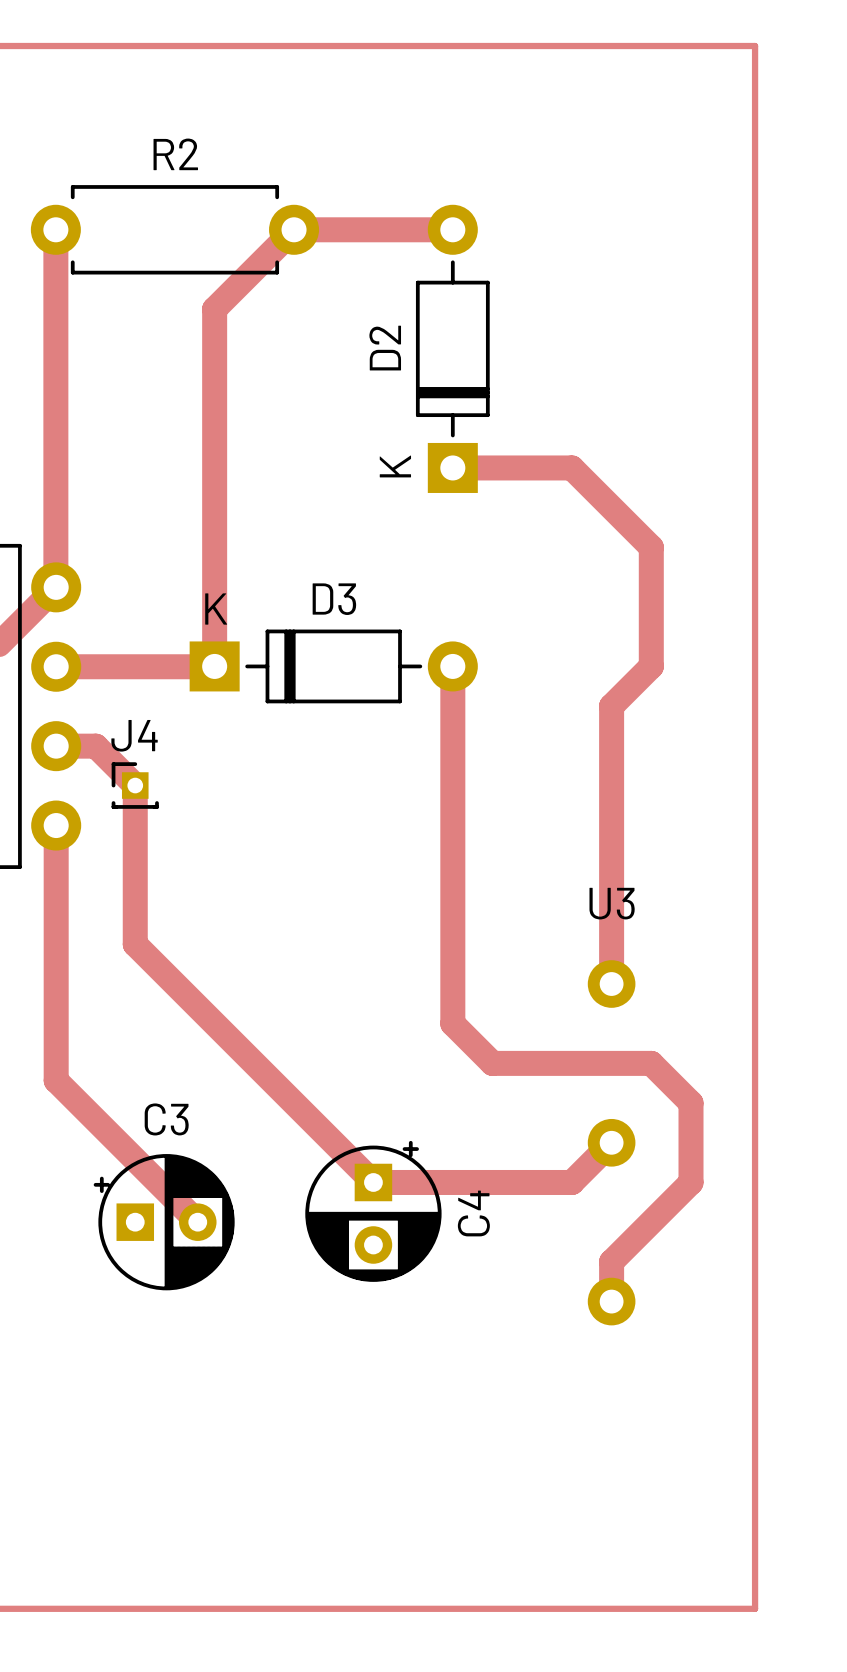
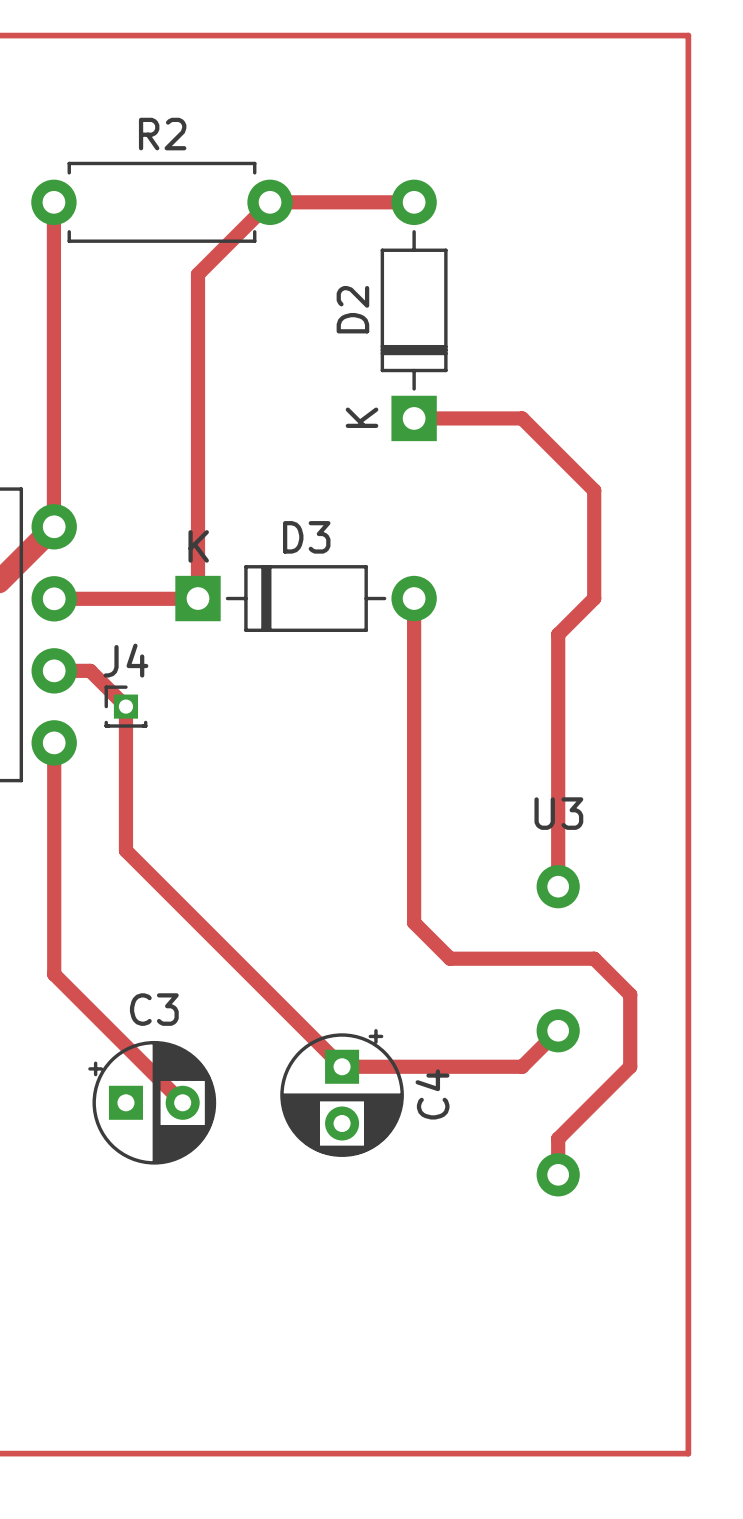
top track width: thick (55, 229) (55, 587) -> thin (53, 202) (53, 526)
top track width: thick (452, 229) (294, 229) (214, 309) (214, 666) -> thin (414, 202) (270, 202) (198, 274) (198, 598)
top track width: thick (452, 467) (571, 467) (651, 547) (651, 666) (611, 706) (611, 984) -> thin (414, 418) (522, 418) (594, 490) (594, 598) (558, 634) (558, 886)
top track width: thick (56, 666) (214, 666) -> thin (54, 598) (197, 598)
top track width: thick (452, 666) (452, 1023) (492, 1063) (651, 1063) (691, 1103) (691, 1182) (611, 1261) (611, 1301) -> thin (414, 598) (414, 922) (450, 958) (594, 958) (630, 994) (630, 1066) (558, 1138) (558, 1174)
top track width: thick (56, 746) (95, 746) (135, 785) (135, 944) (373, 1182) (571, 1182) (611, 1142) -> thin (54, 670) (90, 670) (125, 706) (125, 850) (342, 1066) (522, 1066) (558, 1030)
top track width: thick (56, 825) (56, 1080) (197, 1222) -> thin (54, 742) (54, 974) (182, 1102)

